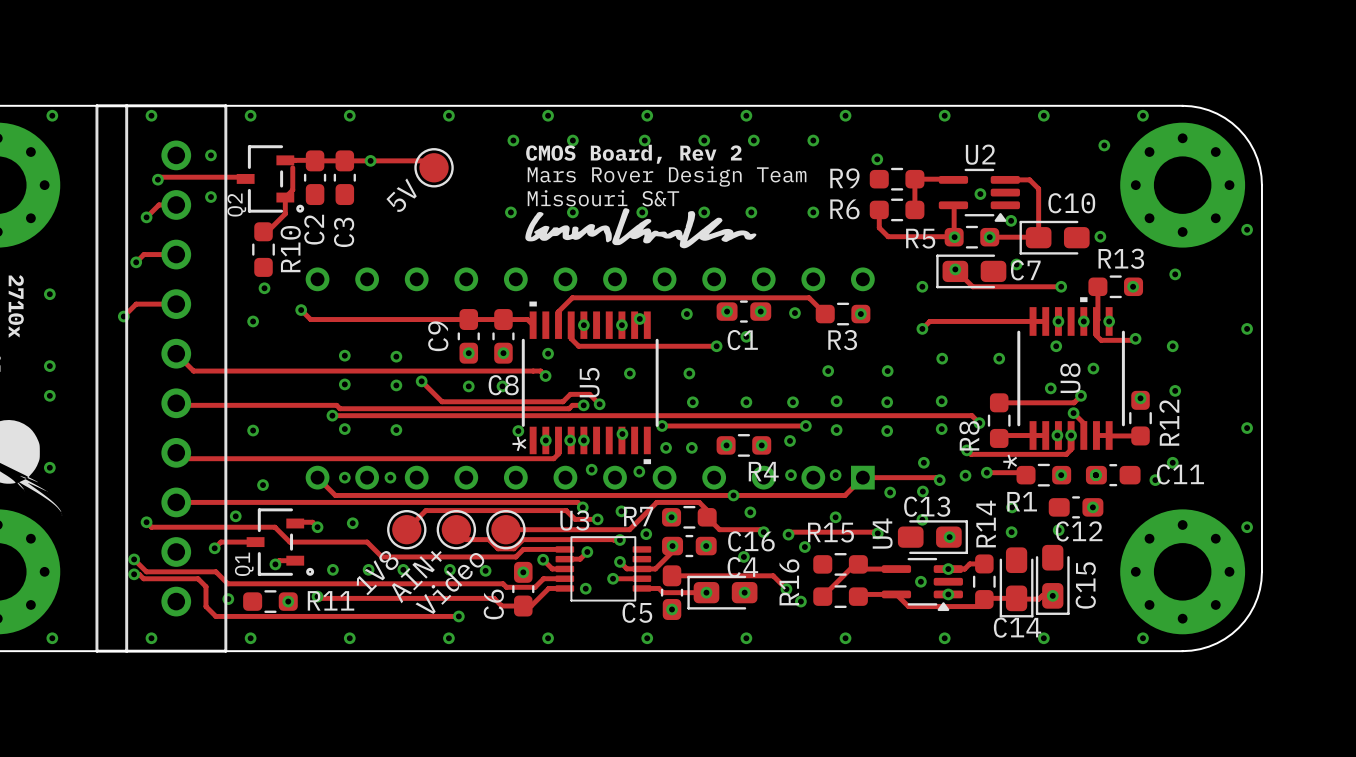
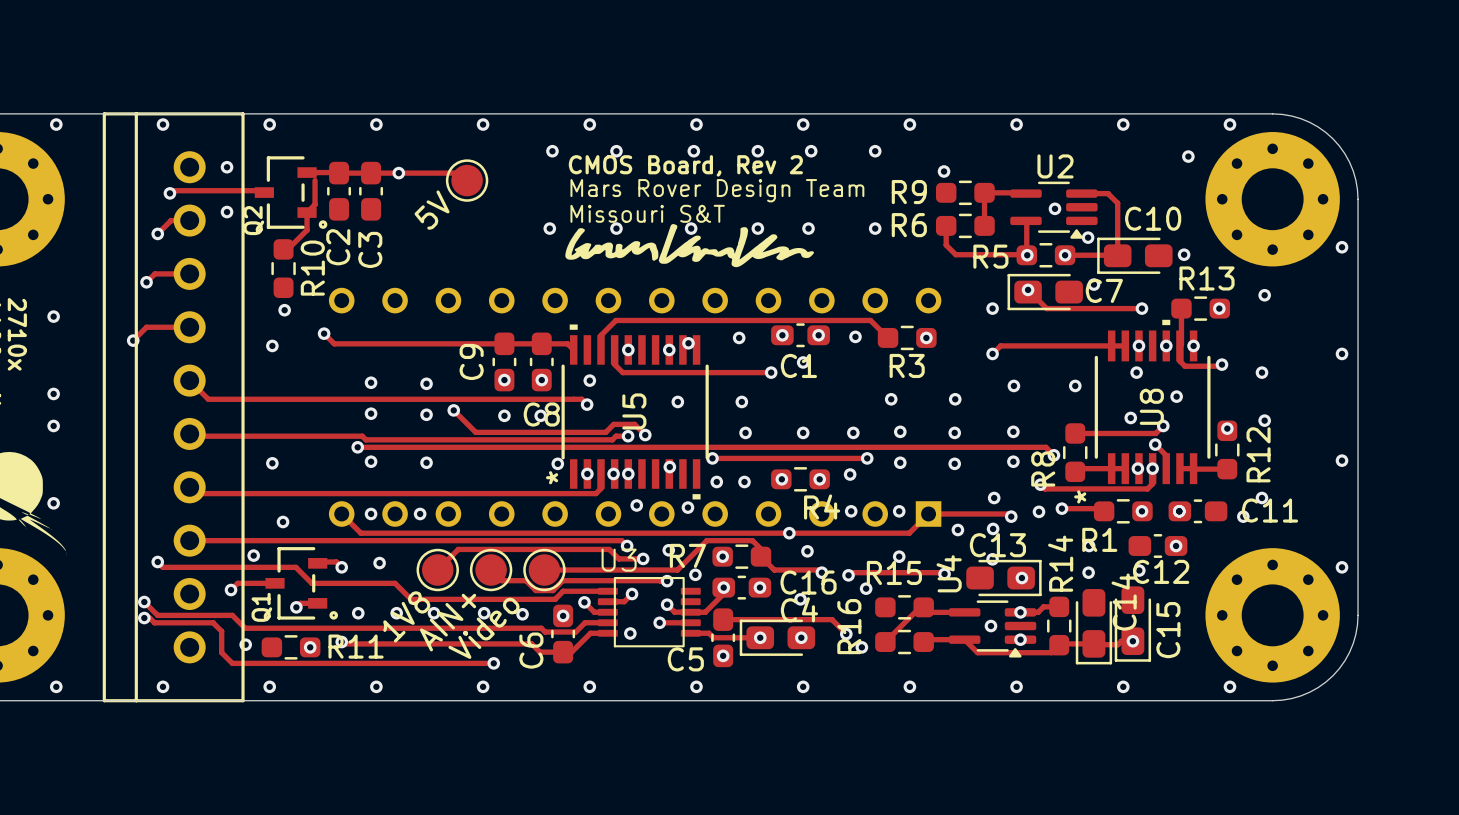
C14 name rotation: 0° (1017, 627) -> 90° counterclockwise (1124, 602)
C14 name position: C14 (1017, 627) -> C14 (1124, 602)

